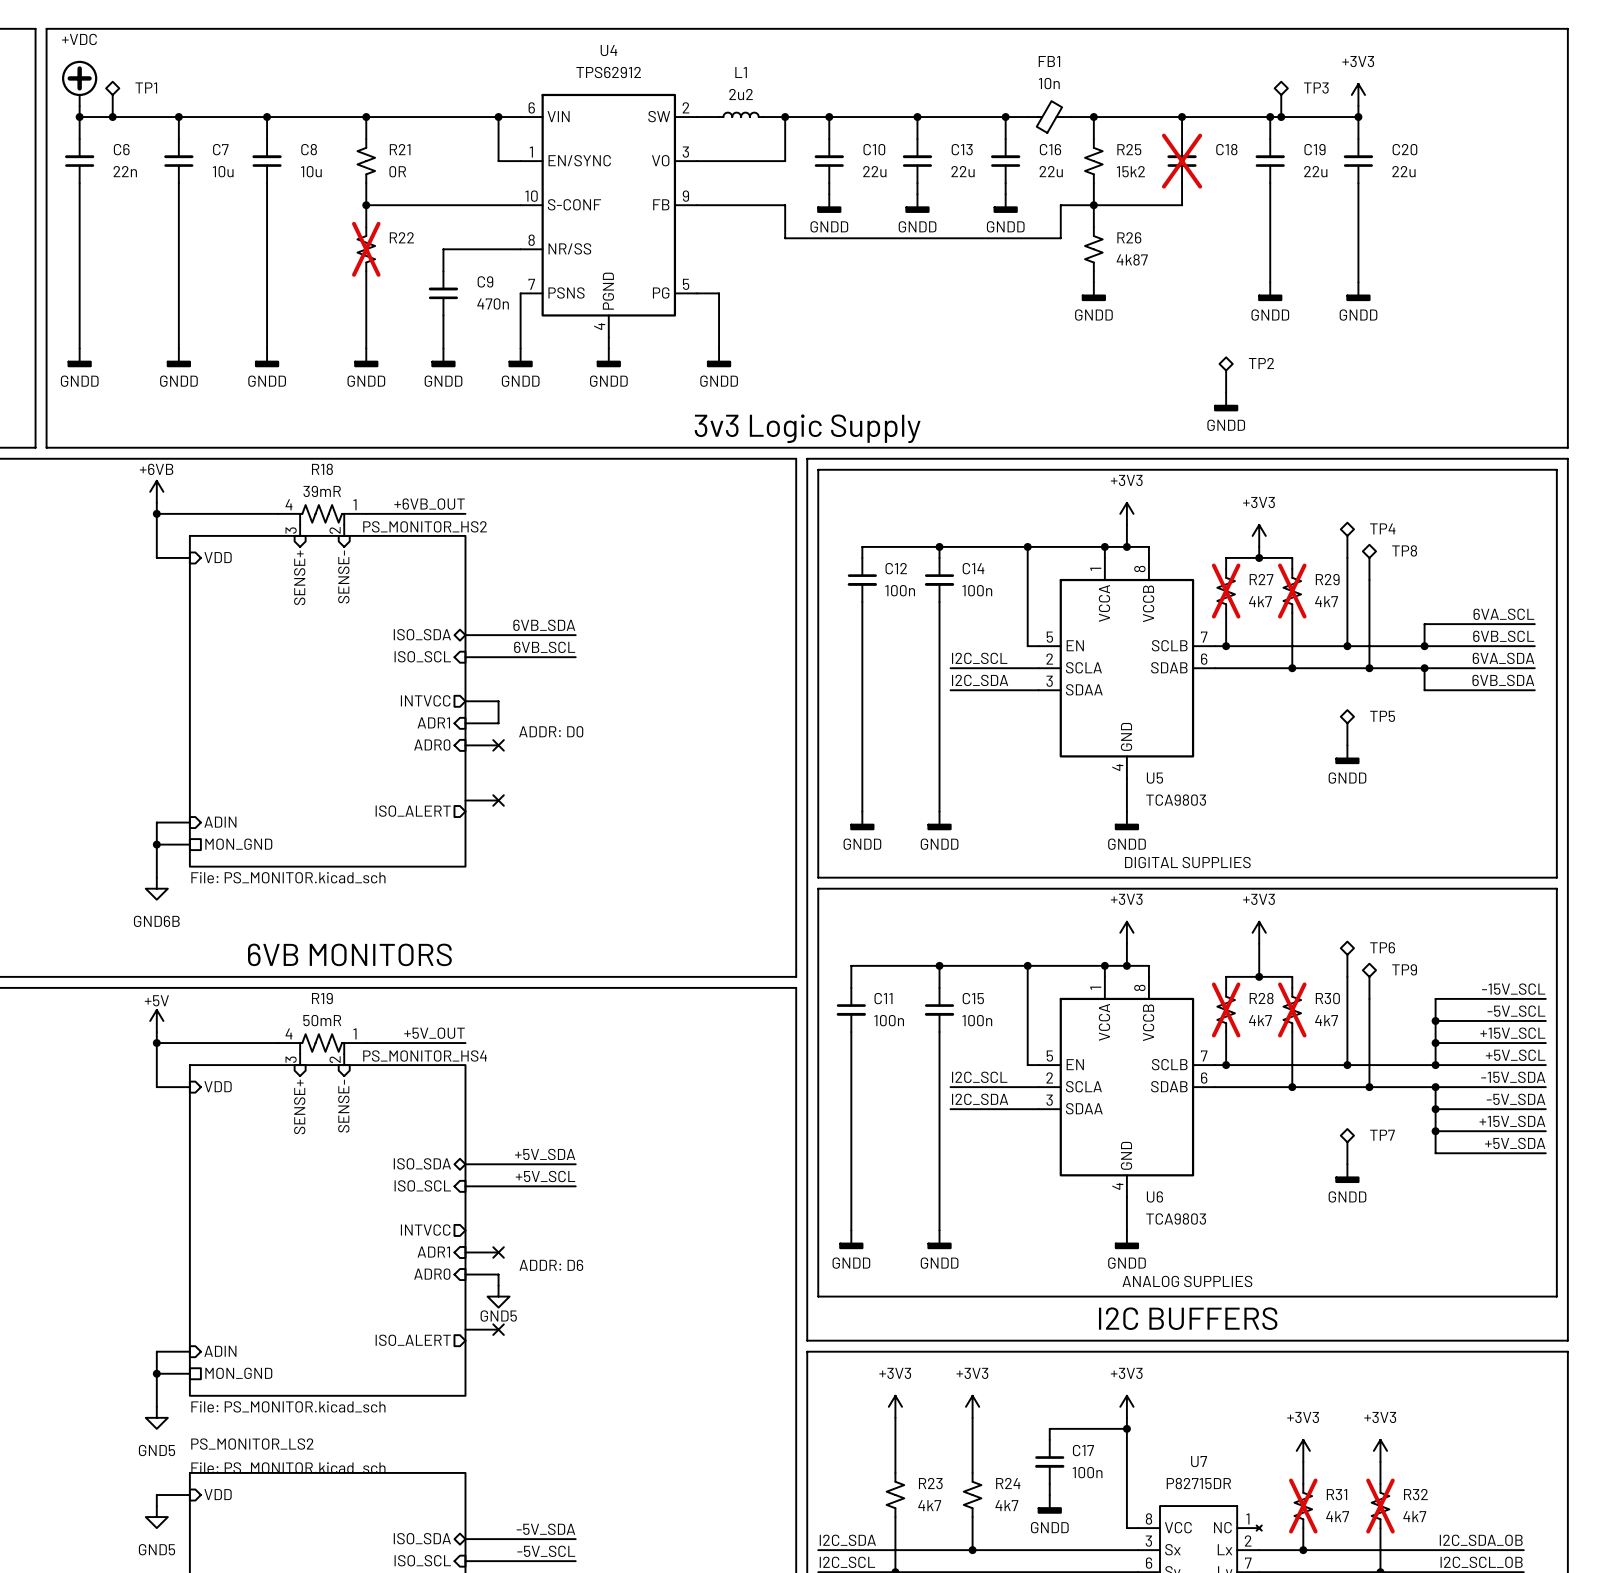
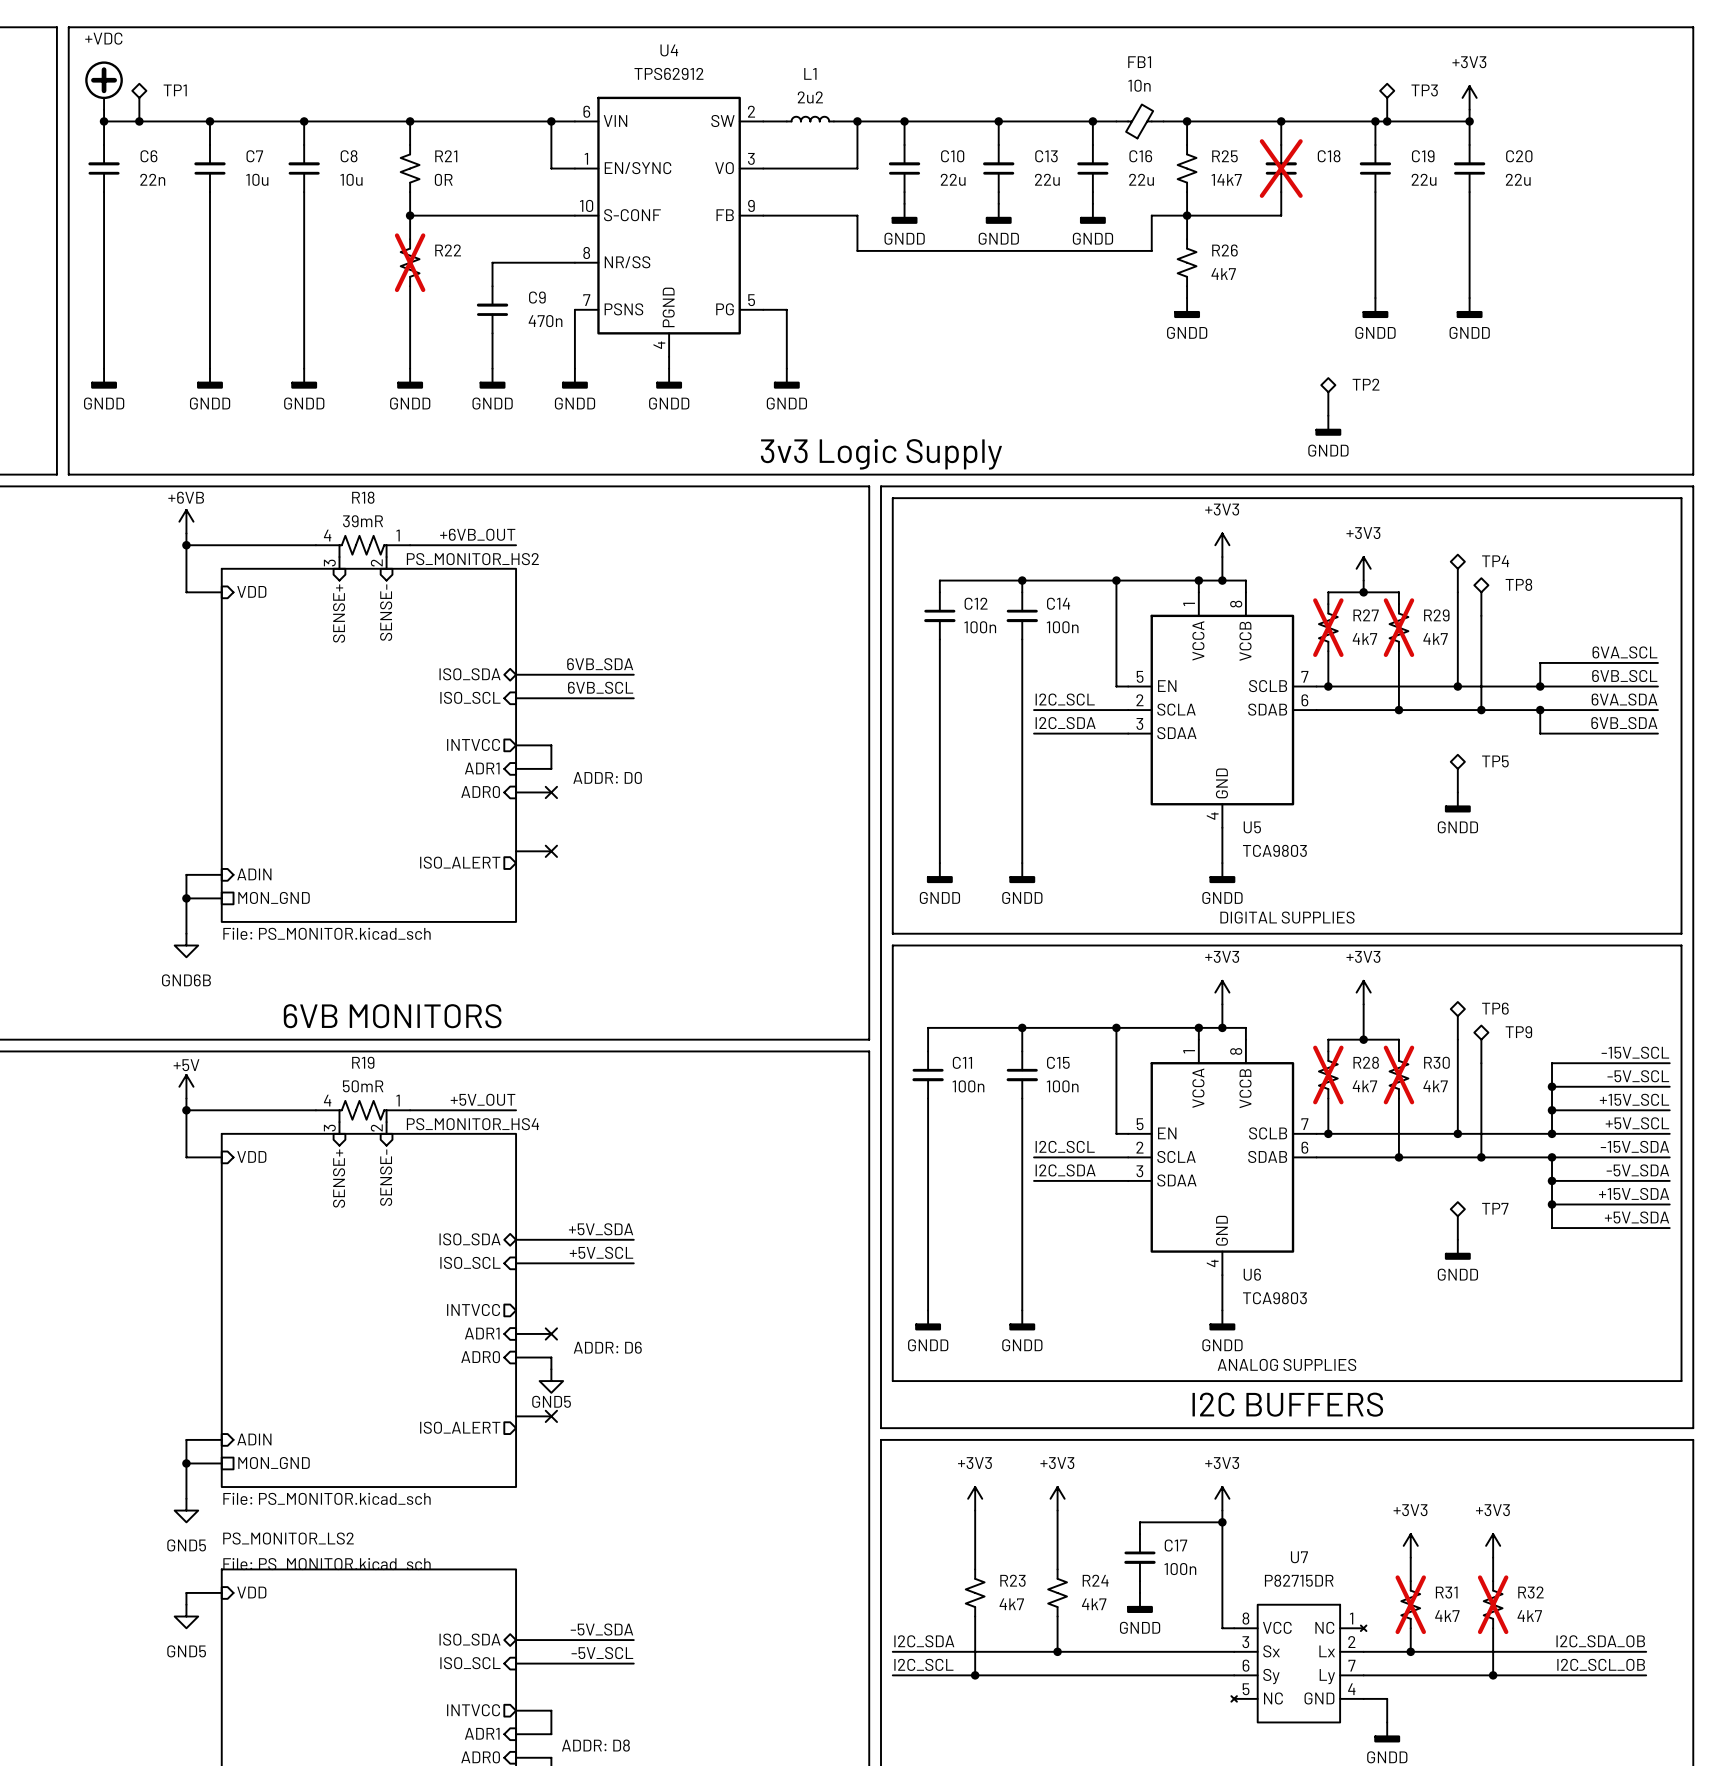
R25 value: 15k2 (1130, 171) -> 14k7 (1226, 179)
R26 value: 4k87 (1132, 259) -> 4k7 (1223, 274)

